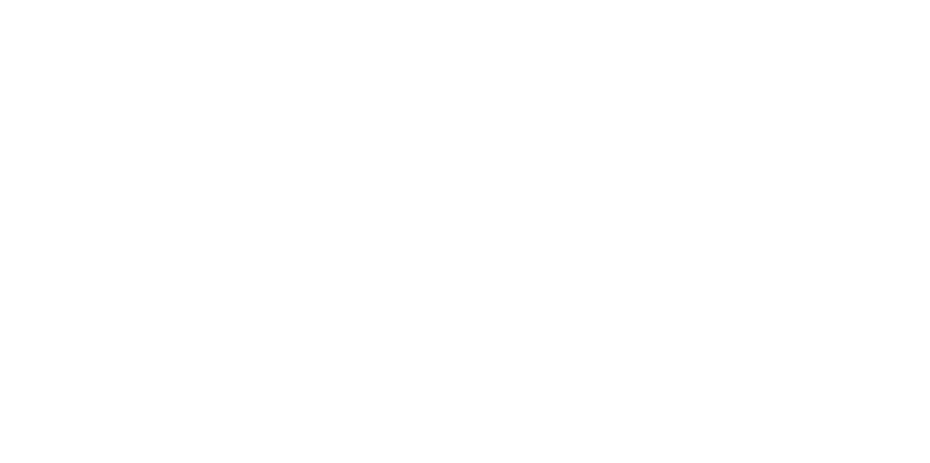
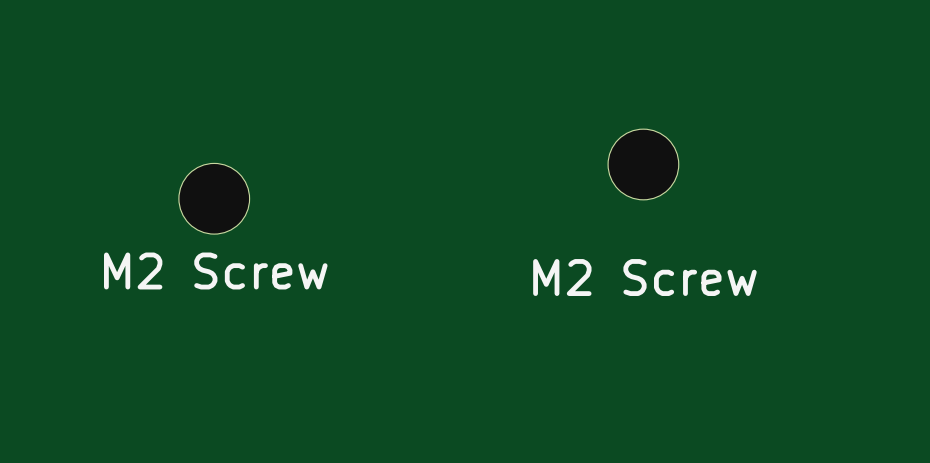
M2 Screw: none -> (643, 164)
M2 Screw: none -> (214, 198)

